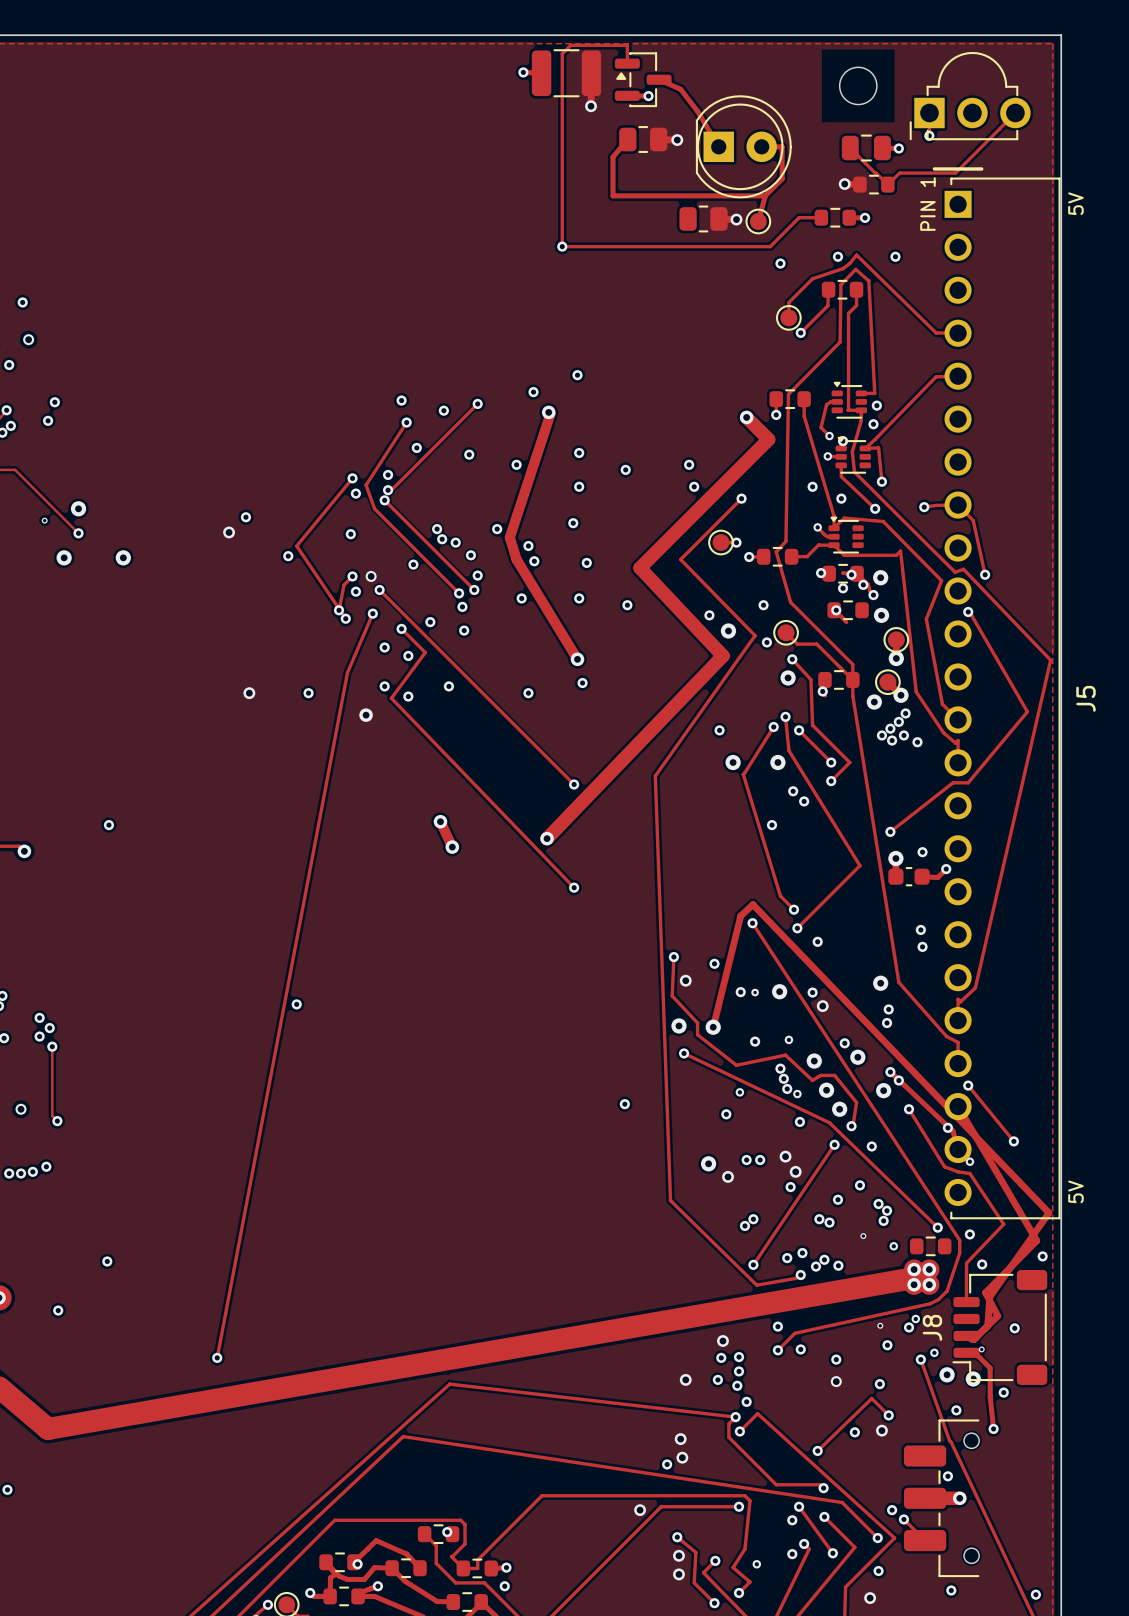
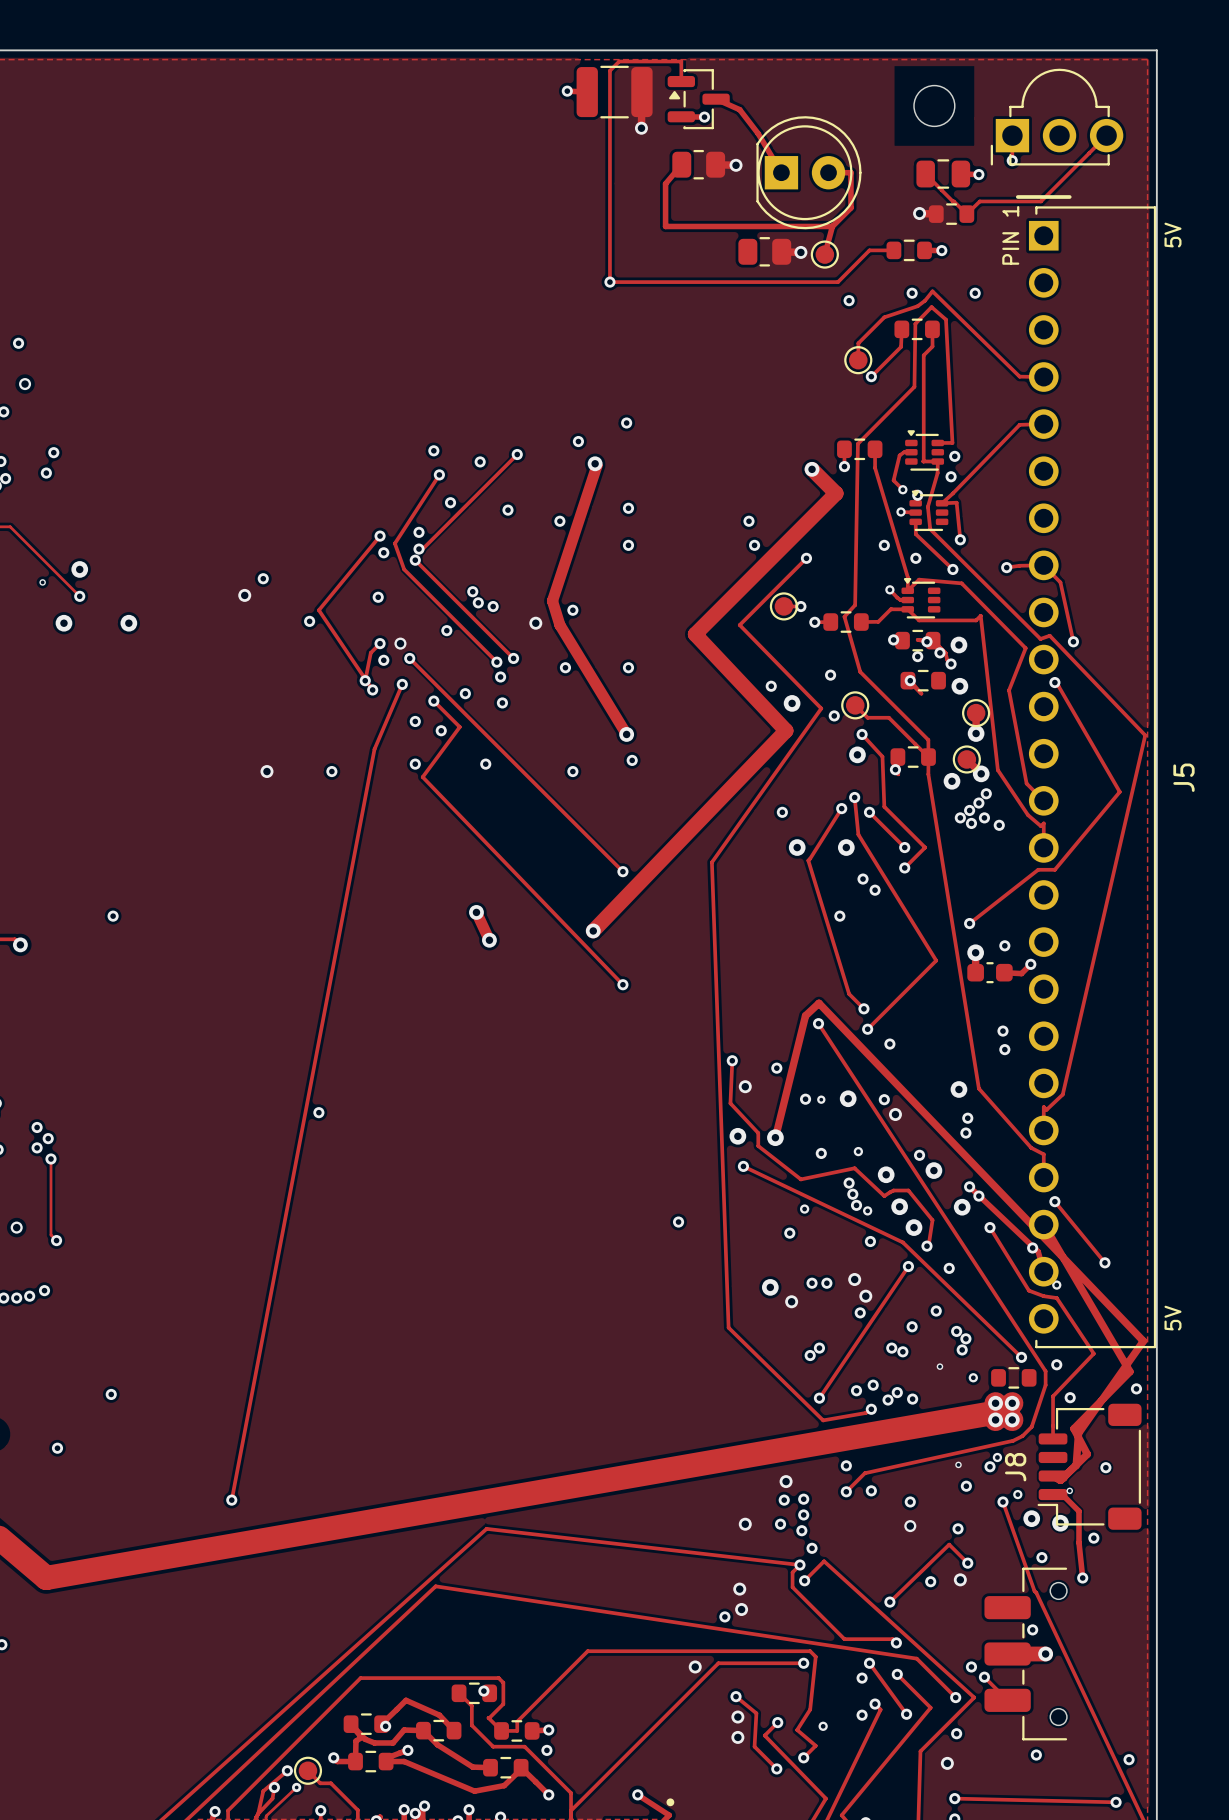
via: (625, 469) -> none
via: (573, 523) -> none
via: (497, 529) -> none
via: (470, 555) -> none
via: none -> (535, 623)
via: (534, 561) -> none
via: (586, 562) -> none
via: (477, 575) -> none
via: (627, 605) -> none
via: (408, 696) -> none
via: (366, 715) -> none

